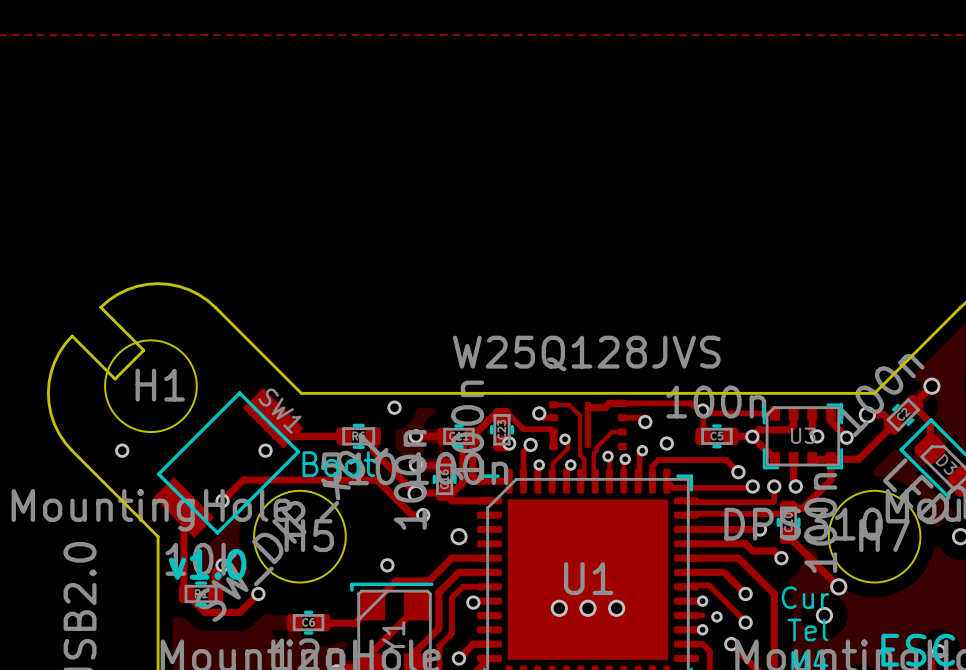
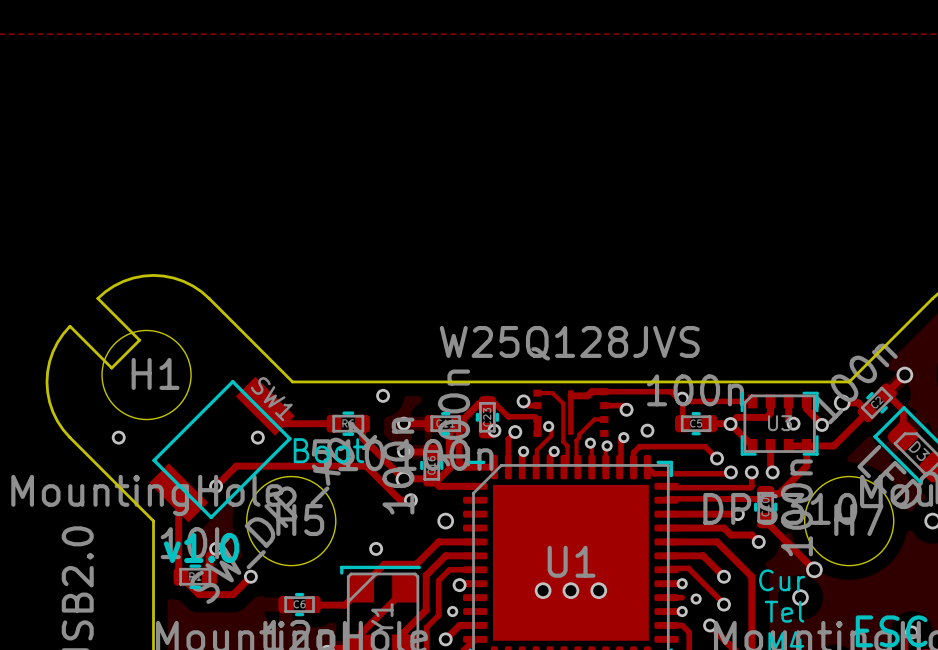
via: none -> (452, 611)

